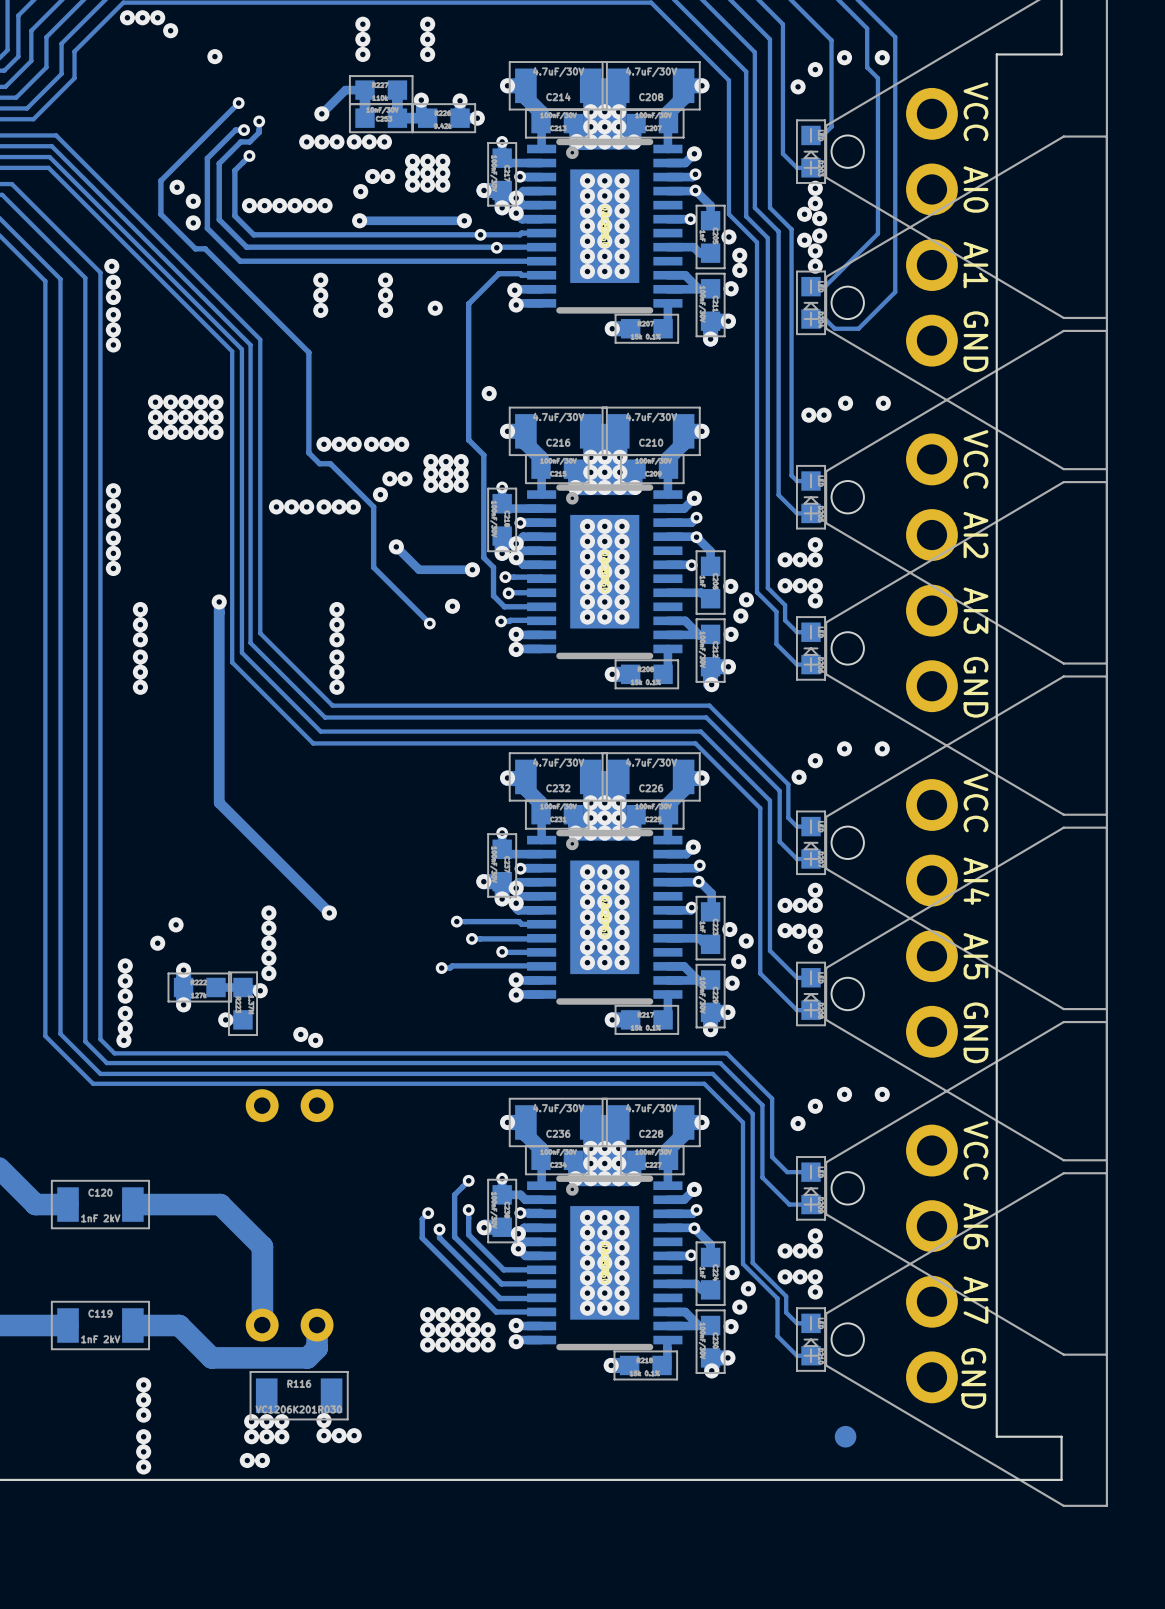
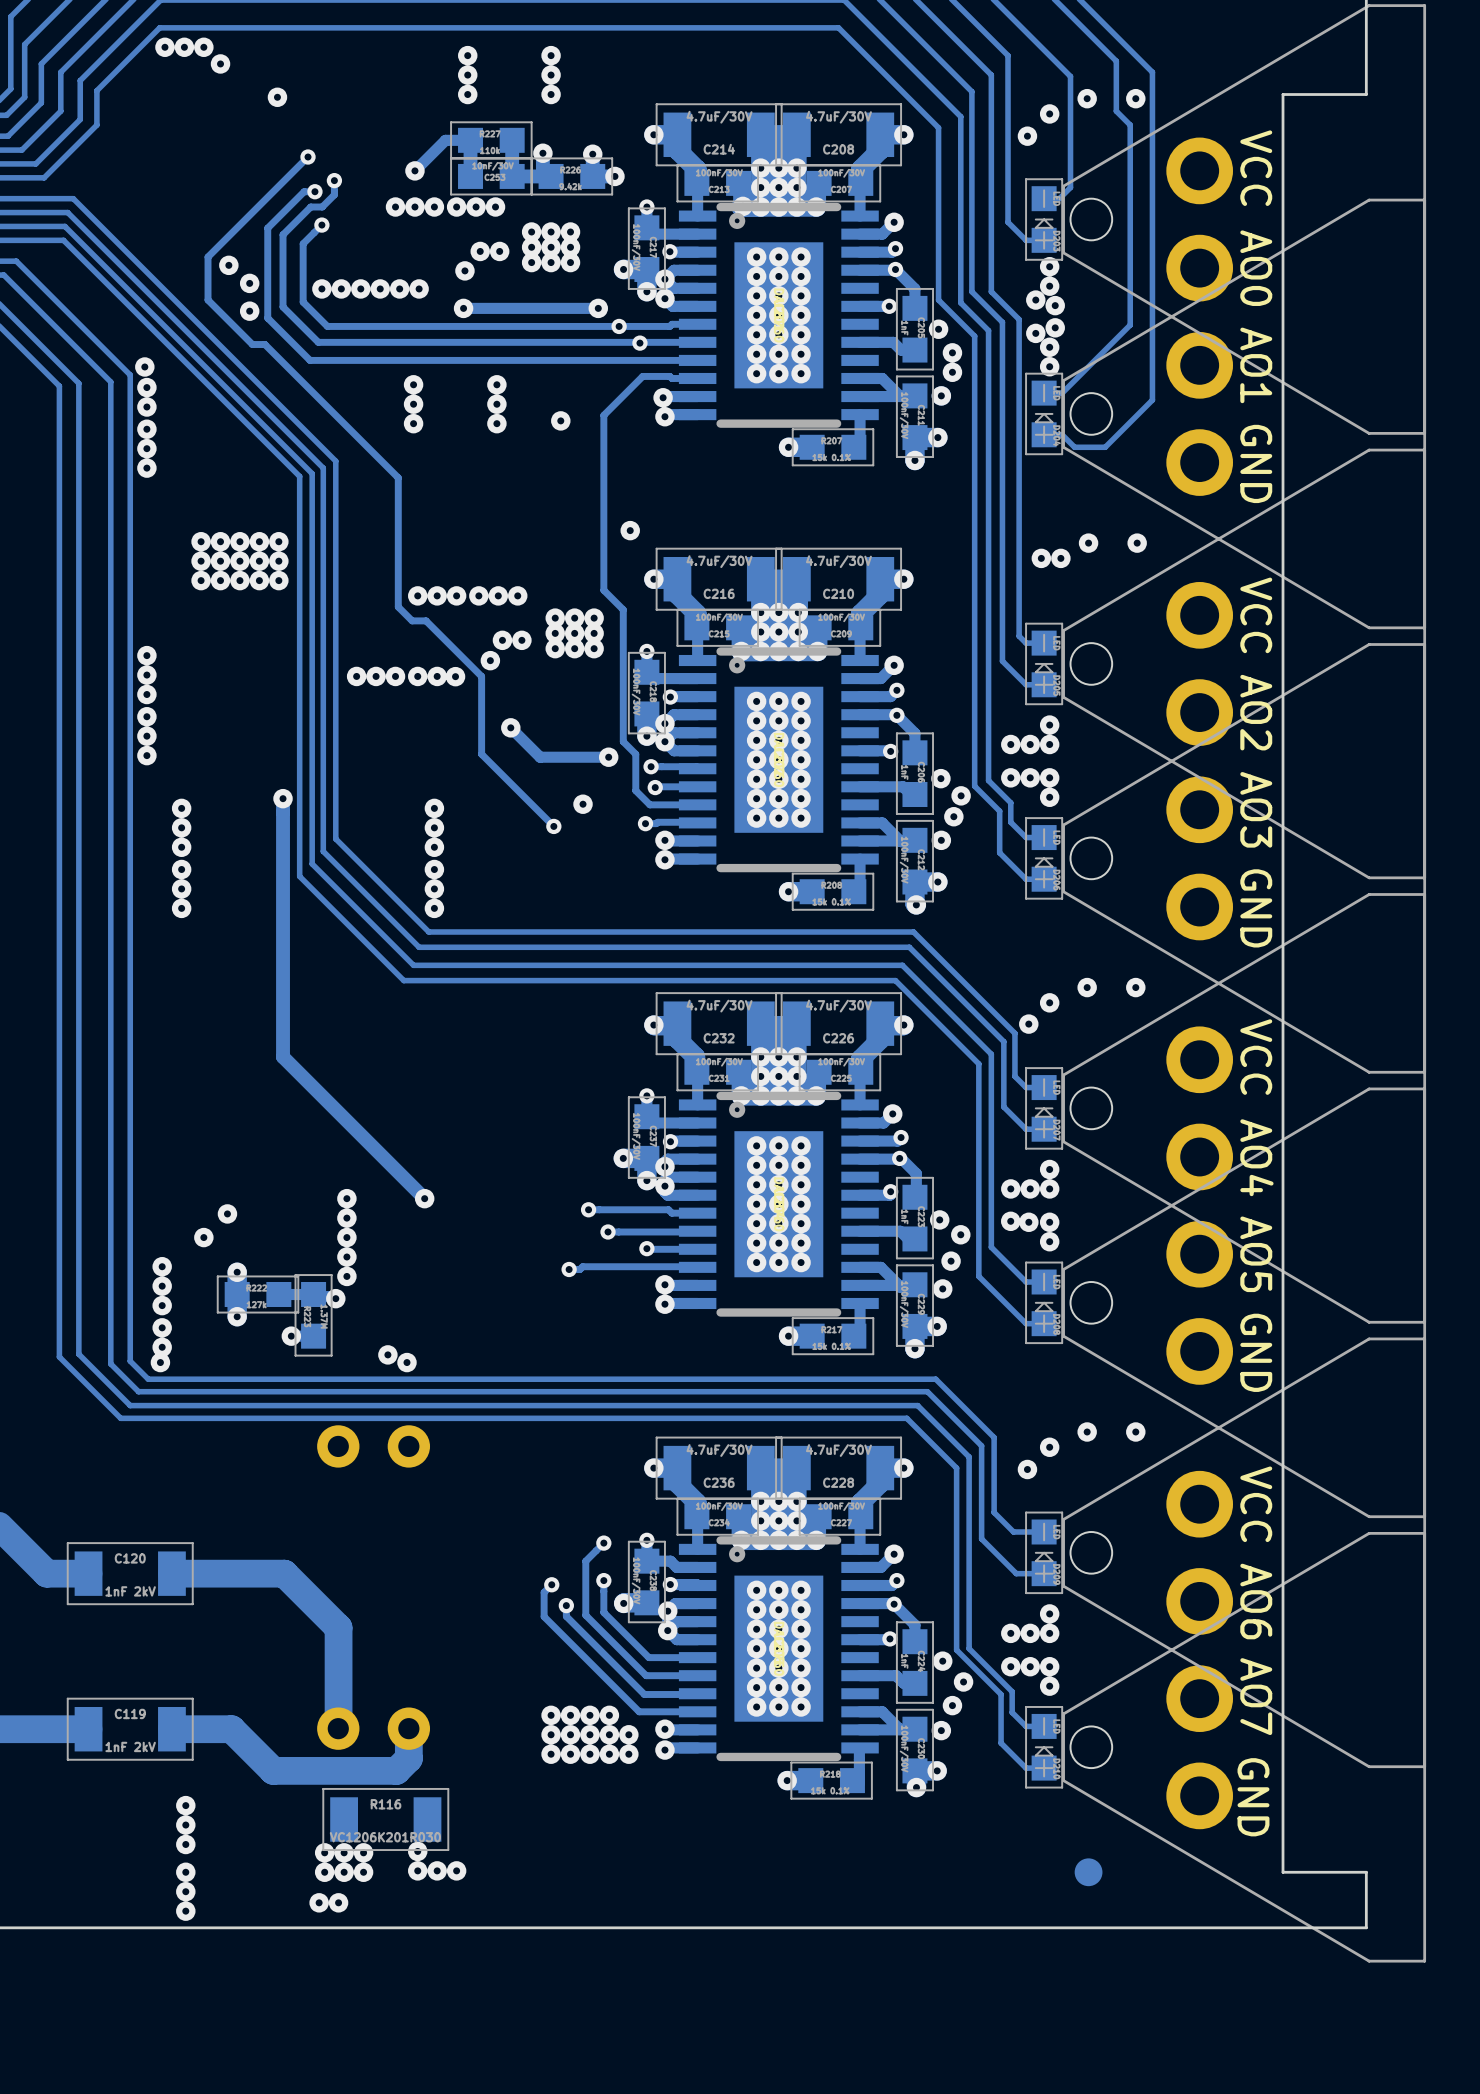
text: AI0 (975, 189) -> AO0 (1256, 268)
text: AI1 (975, 265) -> AO1 (1256, 365)
text: AI2 (975, 535) -> AO2 (1256, 712)
text: AI3 (975, 610) -> AO3 (1256, 809)
text: AI4 (976, 881) -> AO4 (1256, 1157)
text: AI5 (975, 956) -> AO5 (1256, 1254)
text: AI6 (975, 1226) -> AO6 (1256, 1601)
text: AI7 (975, 1300) -> AO7 (1256, 1696)

